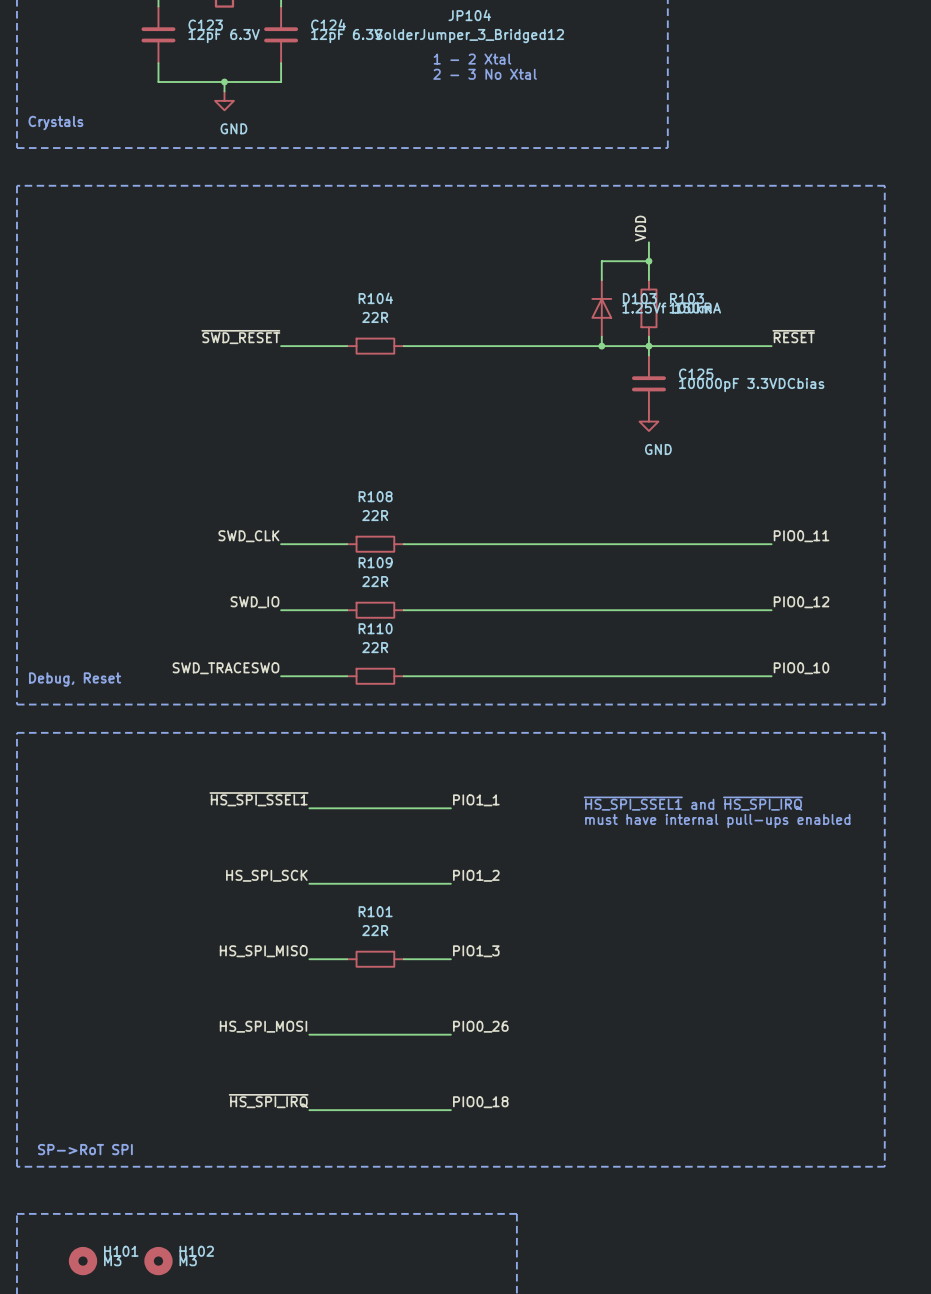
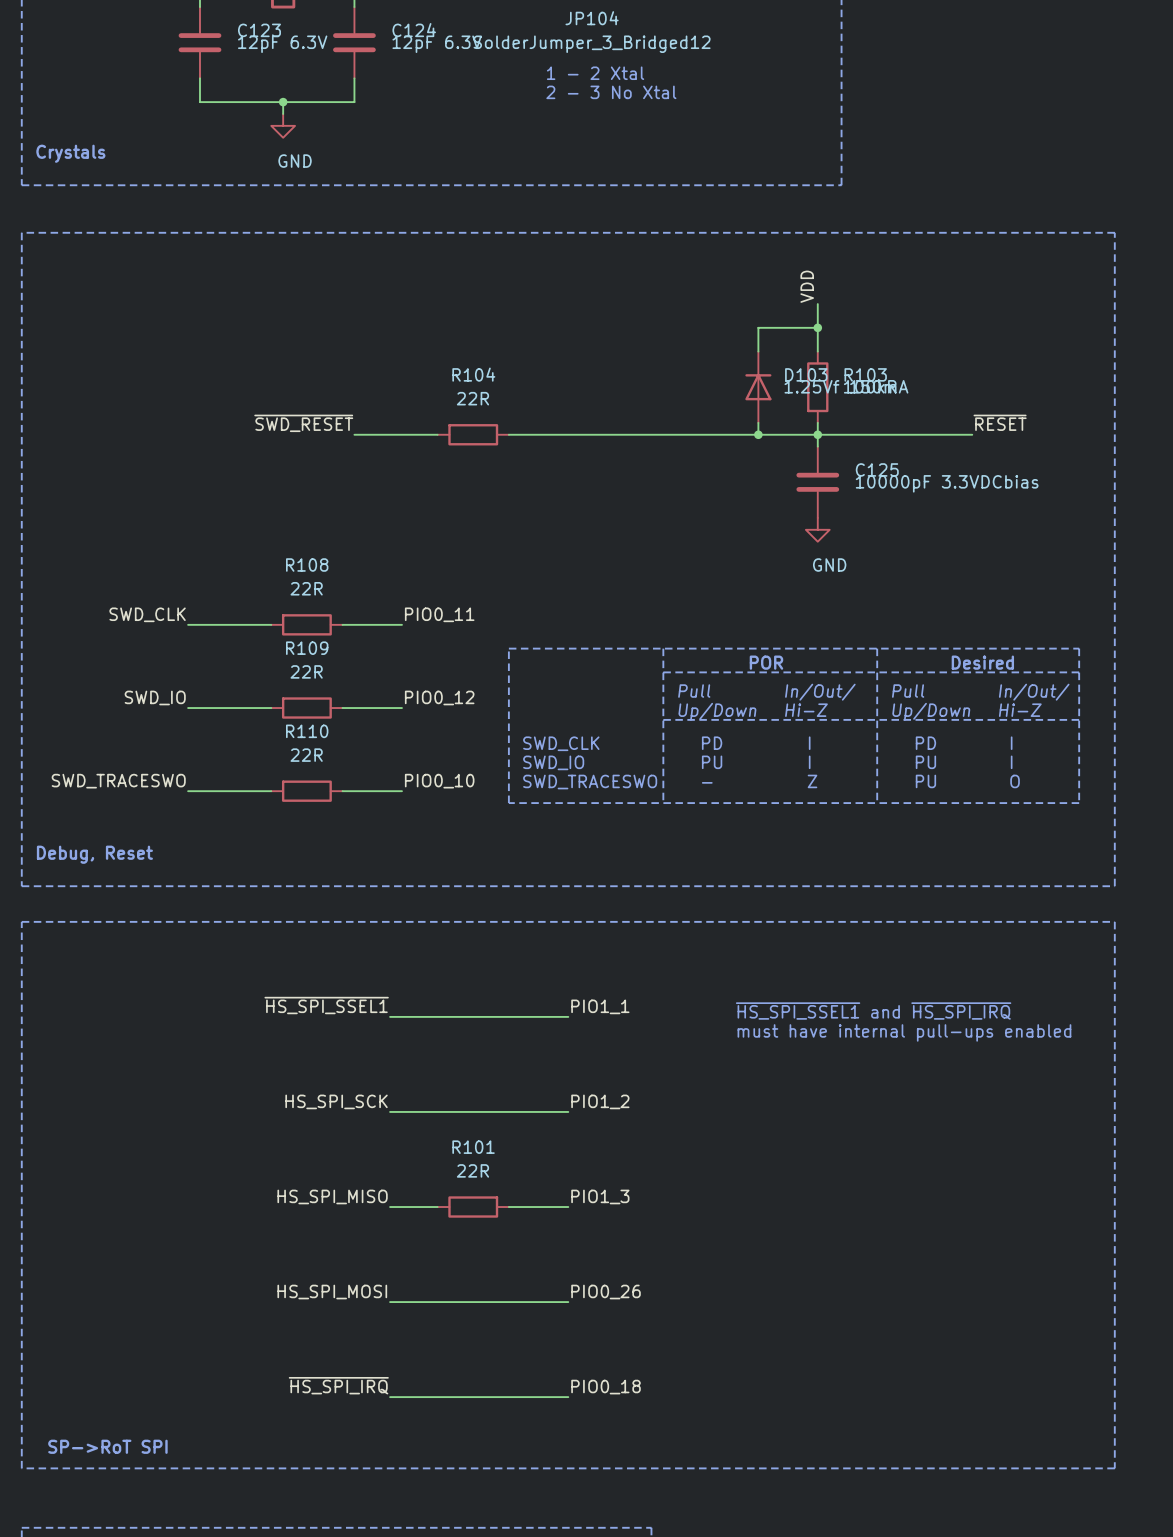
label: none -> PIO0_11 (439, 614)
wire: none -> (342, 624) (401, 624)
line: none -> (508, 648) (508, 803) (1079, 803) (1079, 648) (508, 648)
line: none -> (663, 648) (663, 803)
line: none -> (877, 648) (877, 803)
text: none -> POR (766, 662)
text: none -> Desired (982, 662)
line: none -> (663, 672) (1079, 672)
label position: SWD_CLK (248, 536) -> SWD_CLK (147, 614)
label: PIO0_11 (801, 536) -> none
wire: (281, 544) (347, 544) -> (188, 624) (271, 624)
R108 position: (375, 544) -> (306, 624)
wire: (403, 544) (771, 544) -> none
text: none -> Pull (694, 691)
text: none -> Pull (908, 691)
text: none -> In/Out/ (820, 692)
text: none -> In/Out/ (1034, 692)
label: none -> PIO0_12 (439, 697)
wire: none -> (342, 708) (401, 708)
text: none -> Hi-Z (806, 710)
text: none -> Hi-Z (1020, 710)
text: none -> Up/Down (717, 711)
text: none -> Up/Down (931, 711)
line: none -> (663, 719) (1079, 719)
text: none -> PD (712, 743)
text: none -> I (809, 743)
text: none -> PD (925, 743)
text: none -> I (1011, 743)
text: none -> SWD_CLK (561, 743)
label position: SWD_IO (254, 602) -> SWD_IO (155, 697)
label: PIO0_12 (801, 602) -> none
text: none -> SWD_IO (553, 762)
text: none -> PU (712, 762)
text: none -> I (809, 762)
text: none -> PU (925, 762)
text: none -> I (1011, 762)
wire: (281, 610) (347, 610) -> (188, 708) (271, 708)
R109 position: (375, 610) -> (306, 708)
wire: (403, 610) (771, 610) -> none
label: none -> PIO0_10 (439, 781)
text: none -> SWD_TRACESWO (590, 782)
text: none -> Z (812, 781)
text: none -> PU (925, 781)
text: none -> O (1015, 781)
text: none -> - (707, 782)
wire: none -> (342, 791) (401, 791)
label position: SWD_TRACESWO (225, 668) -> SWD_TRACESWO (118, 781)
label: PIO0_10 (801, 668) -> none
wire: (281, 676) (347, 676) -> (188, 791) (271, 791)
R110 position: (375, 676) -> (306, 791)
wire: (403, 676) (771, 676) -> none

